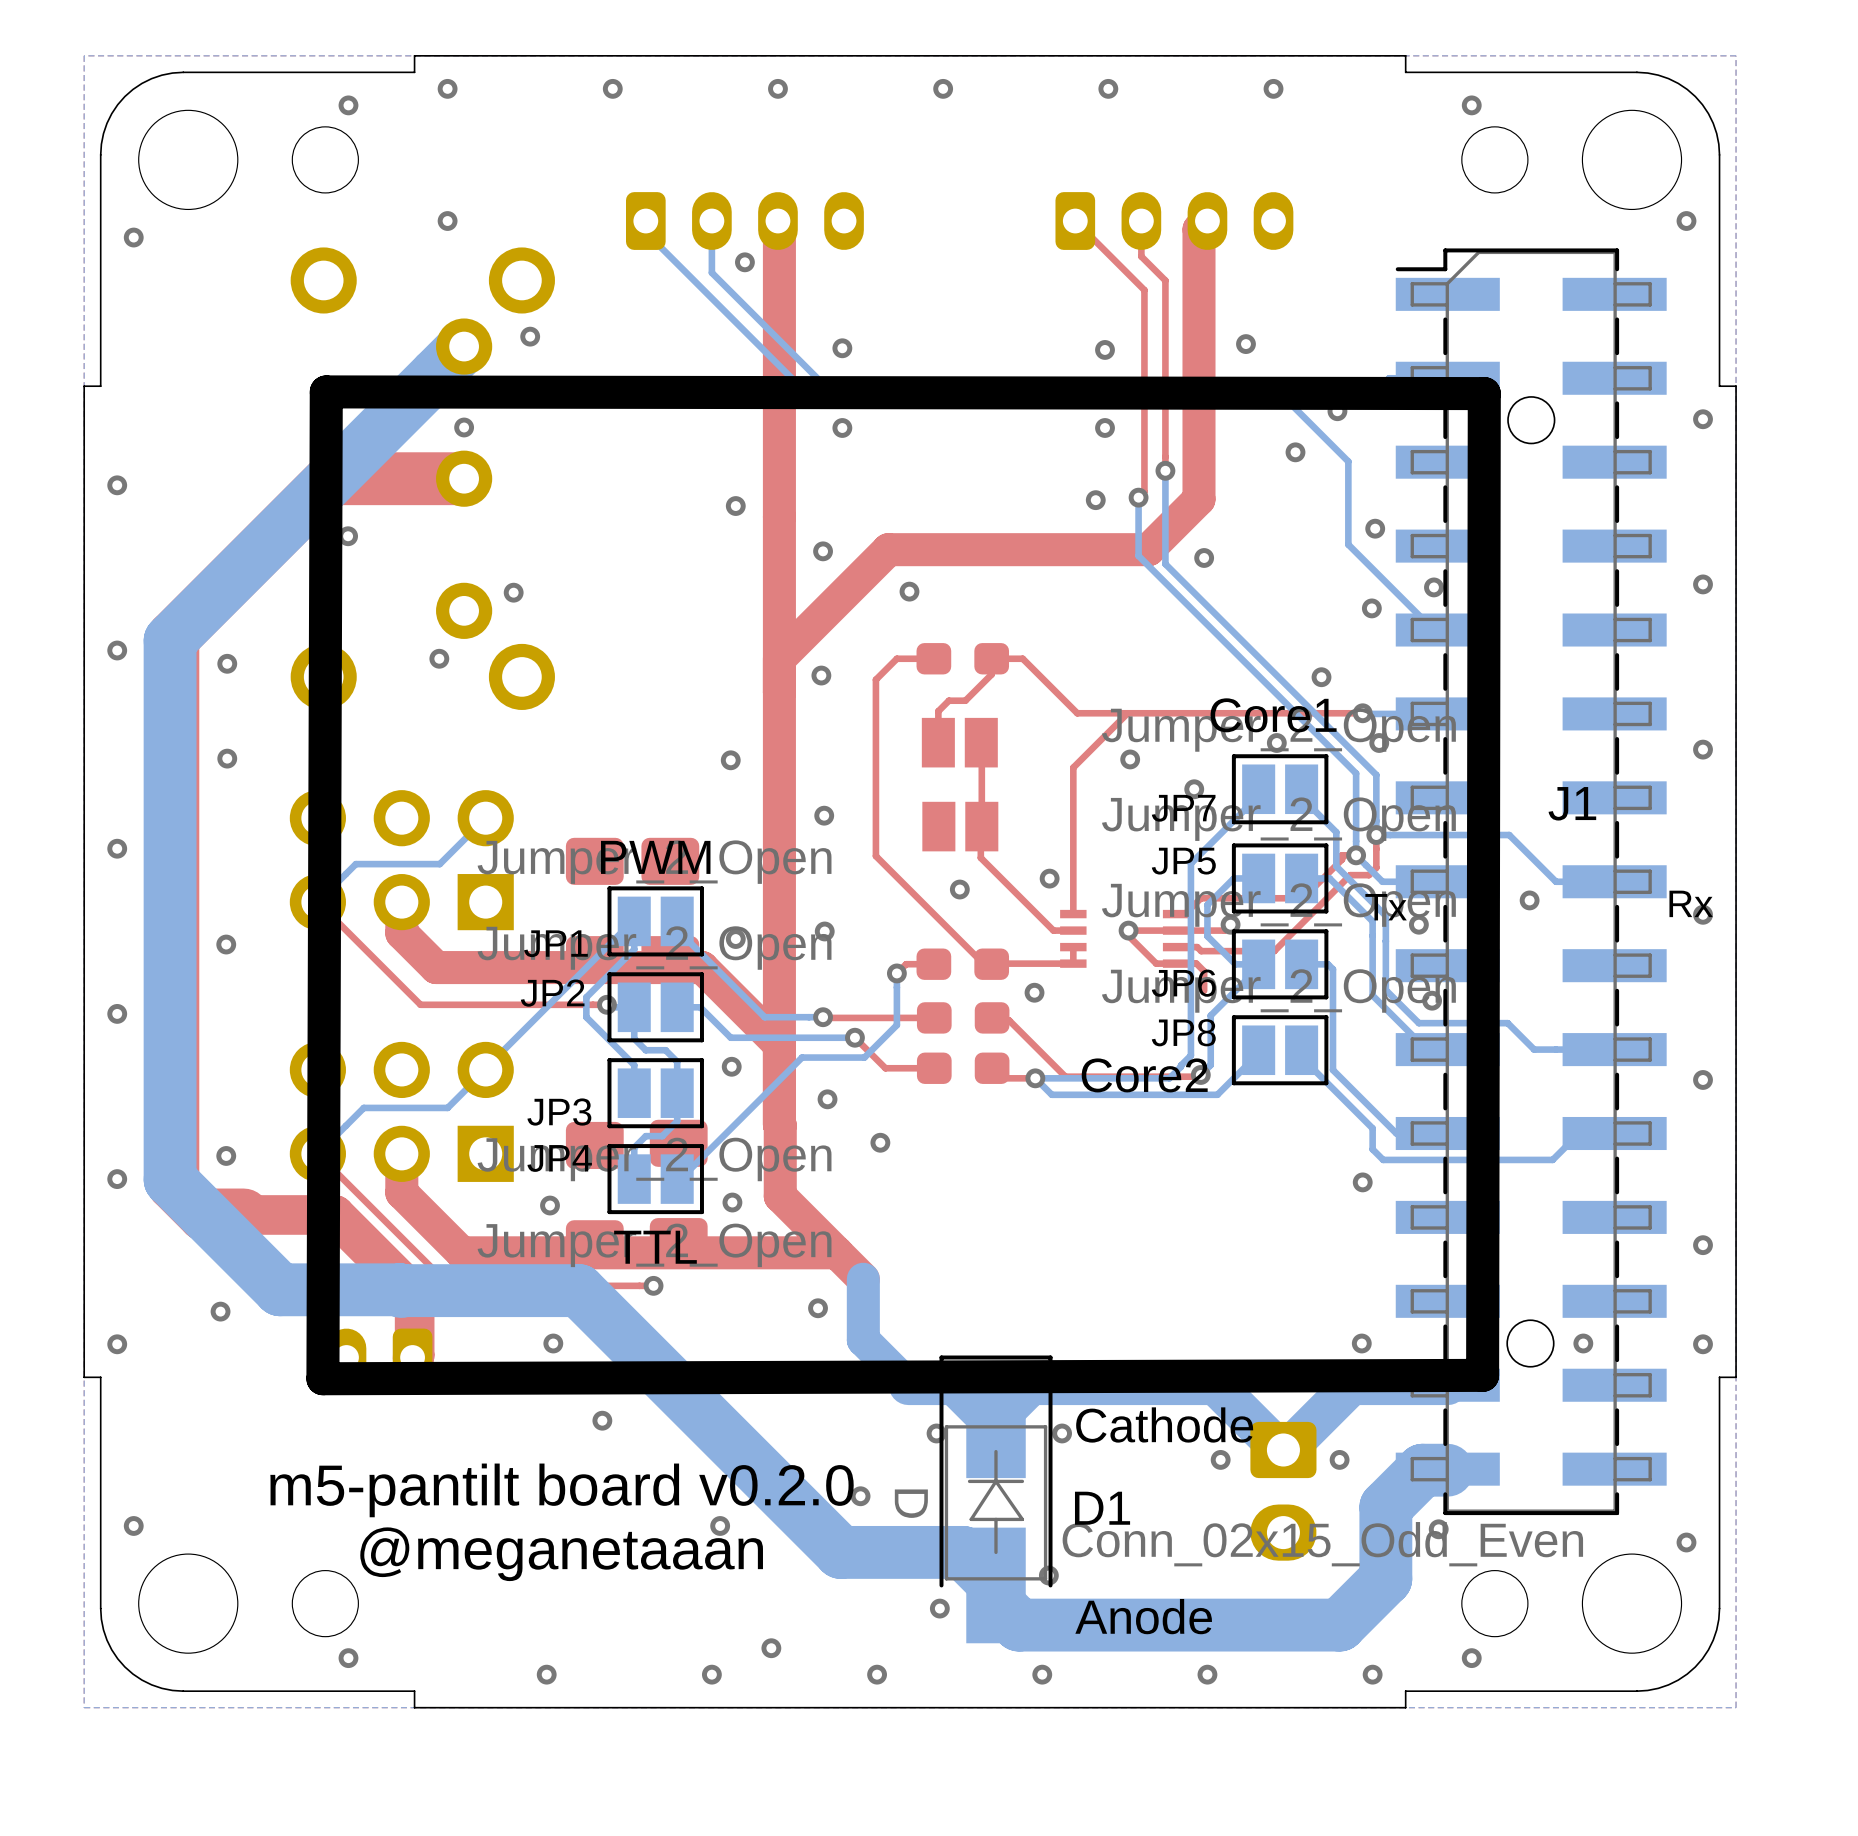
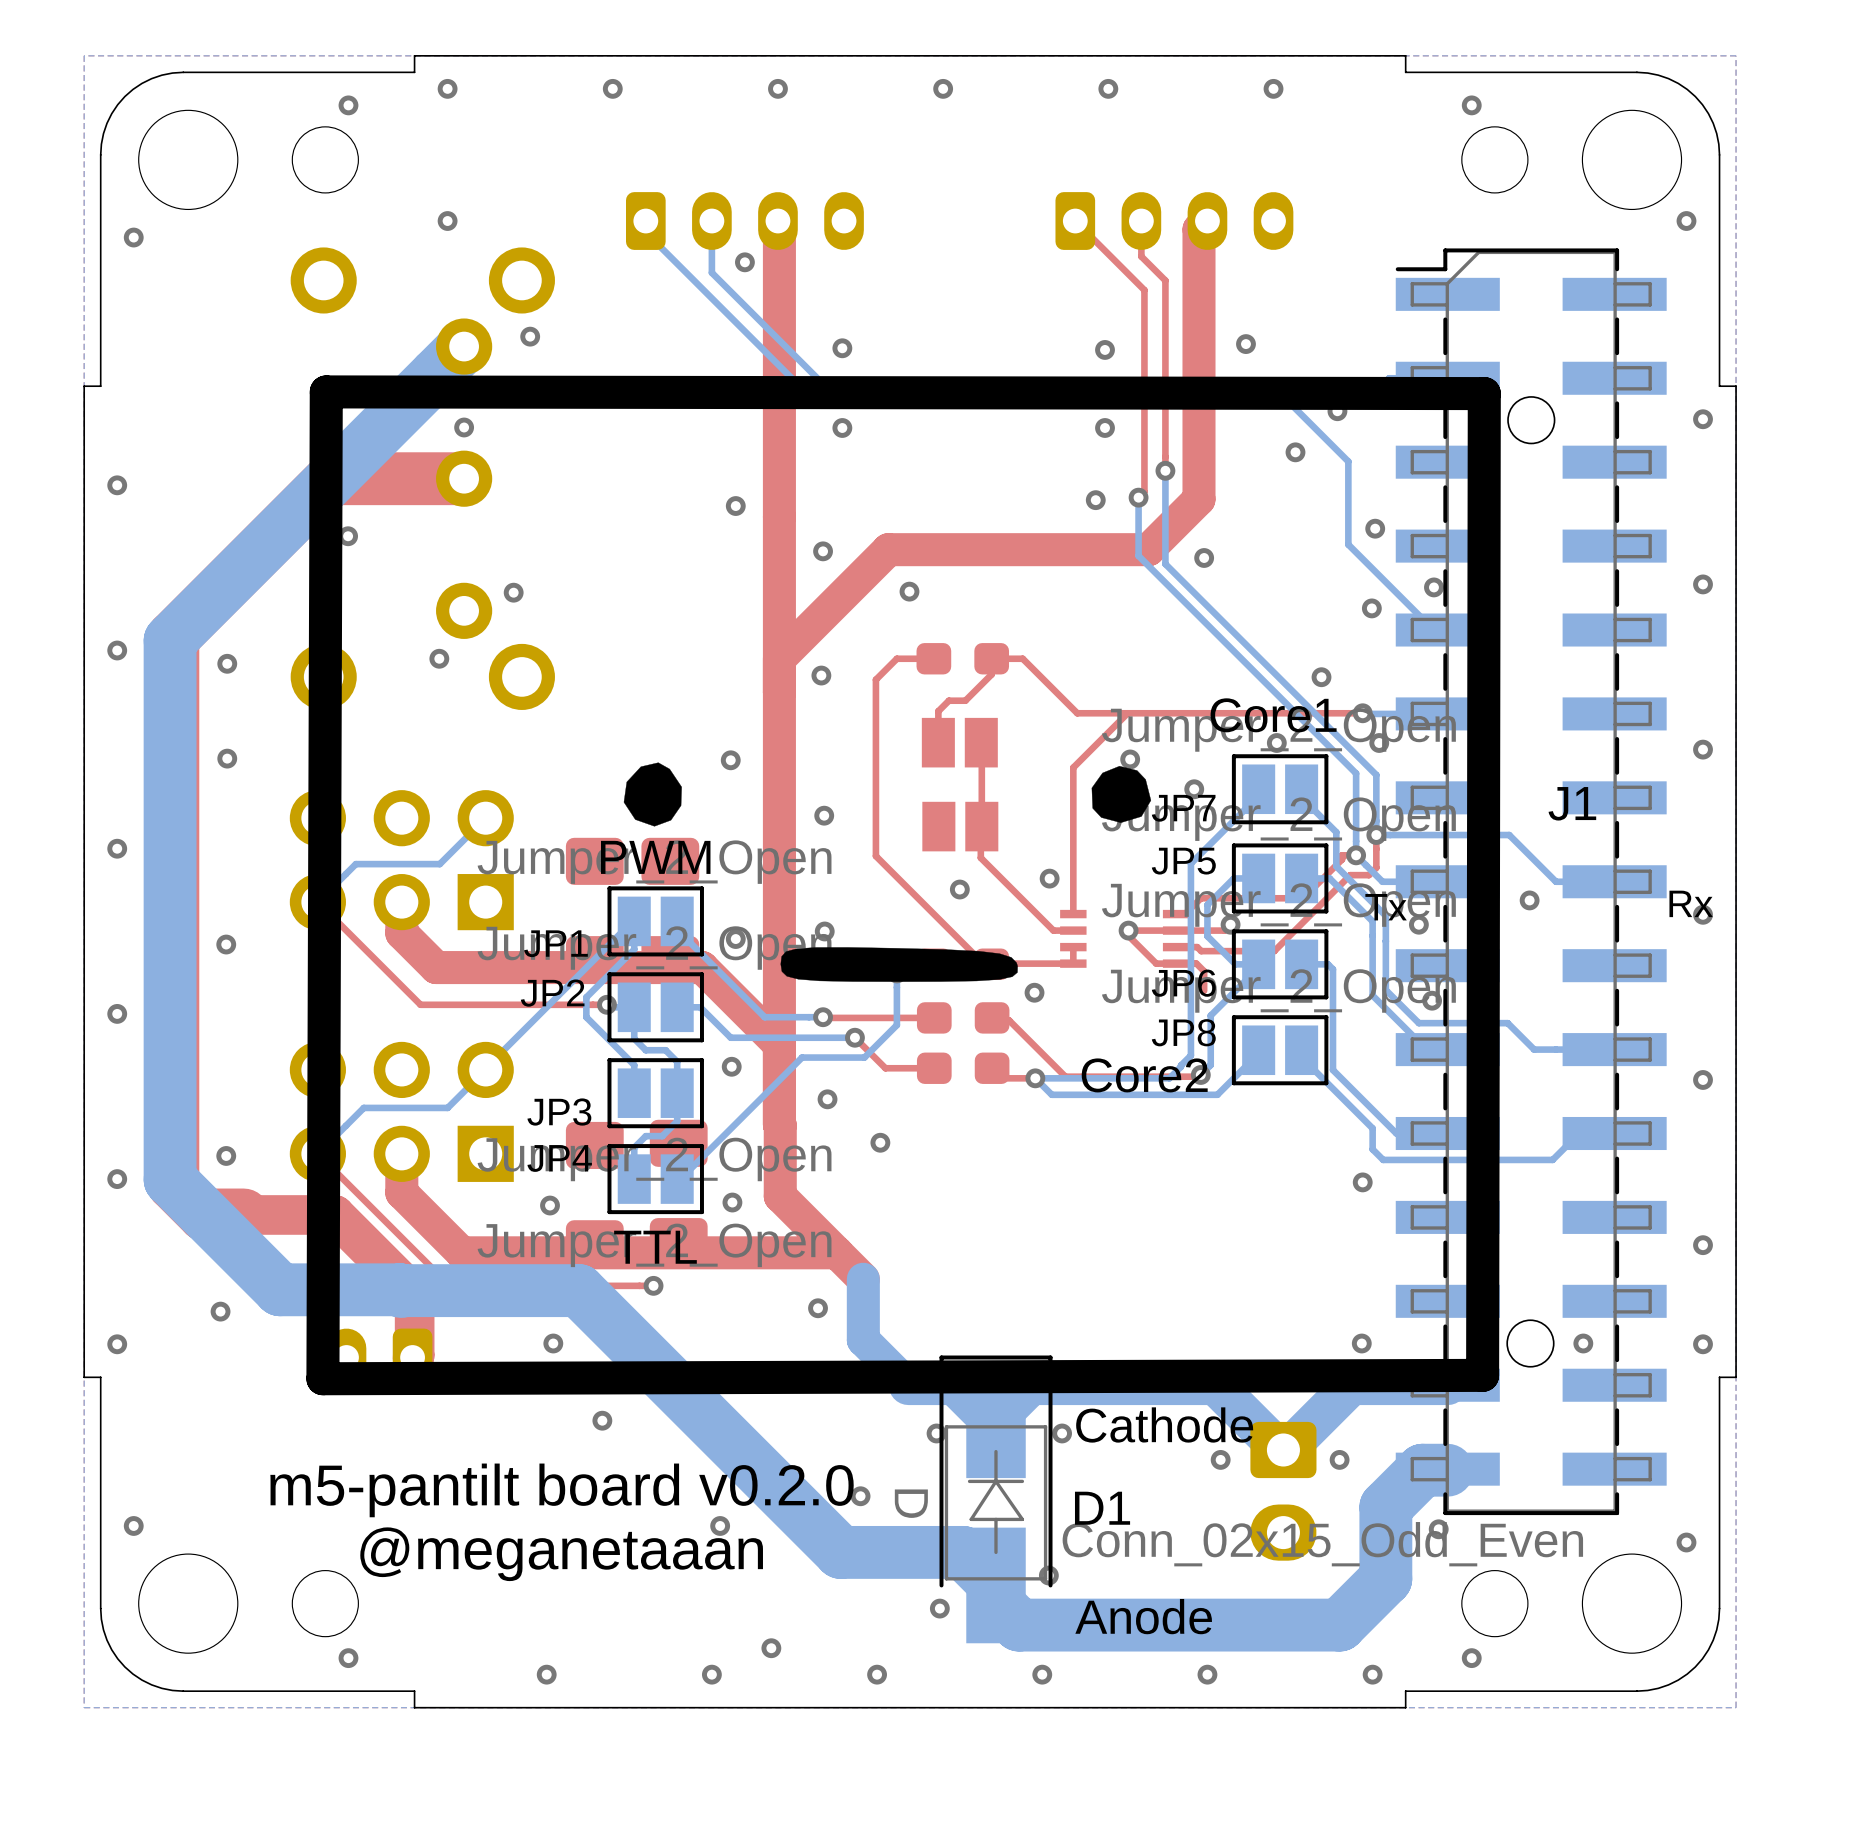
drawing: none -> [623, 762, 1152, 982]

